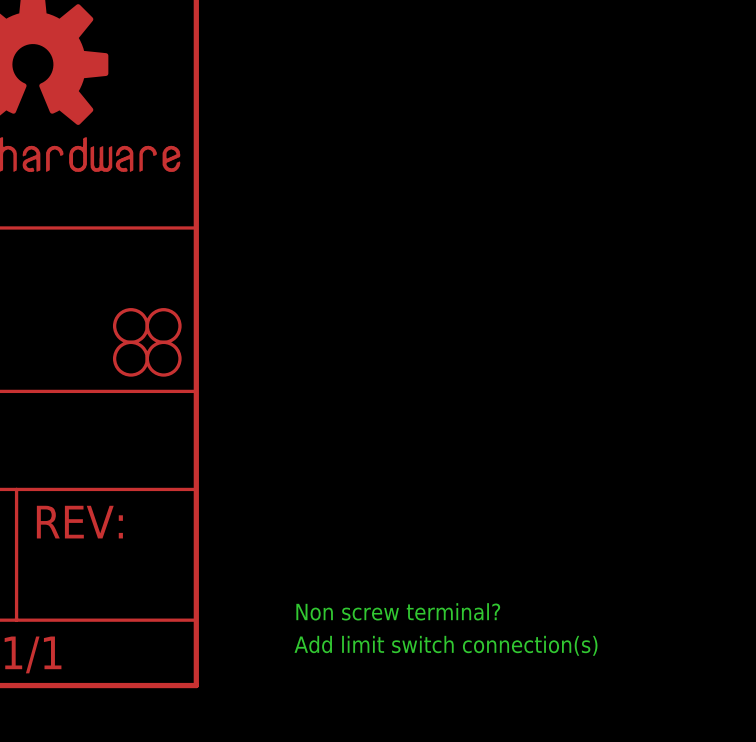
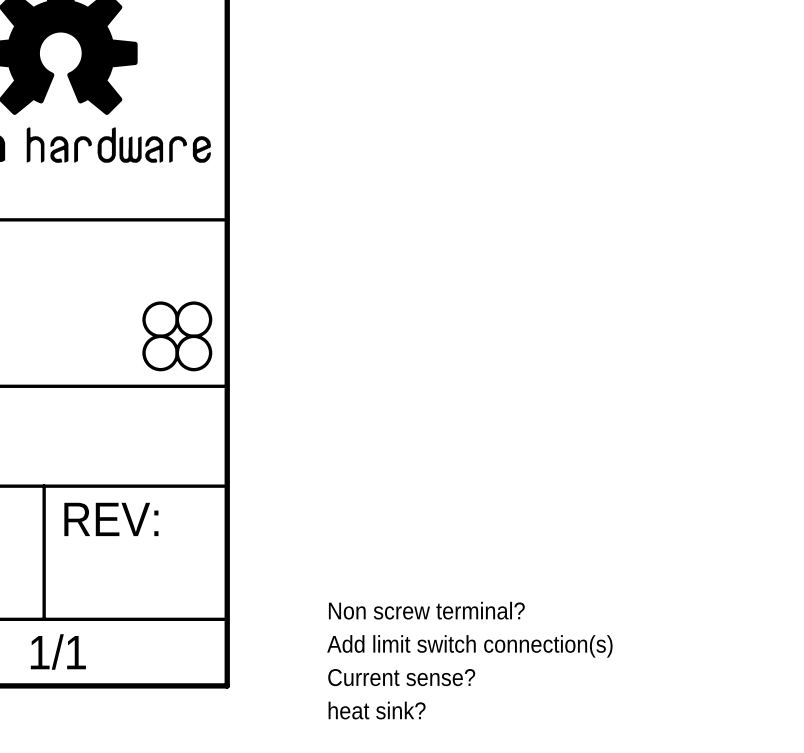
text: none -> Current sense? (401, 677)
text: none -> heat sink? (377, 710)

